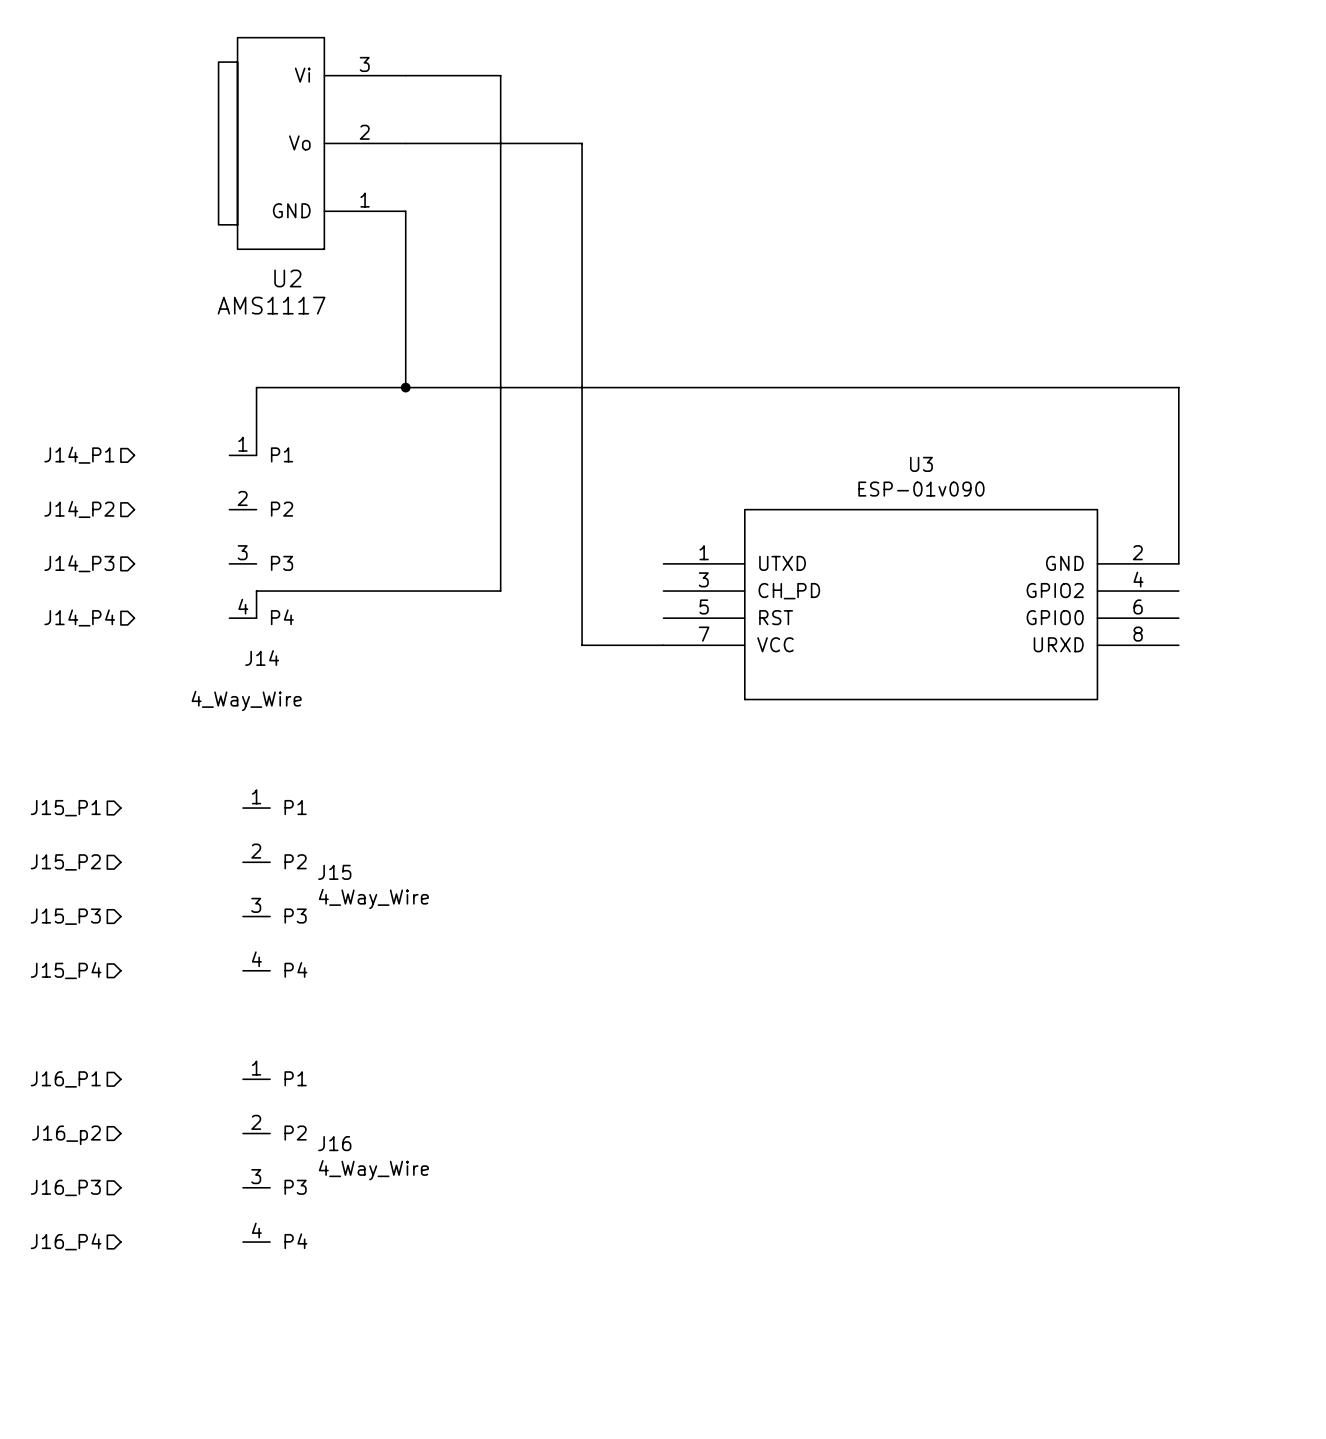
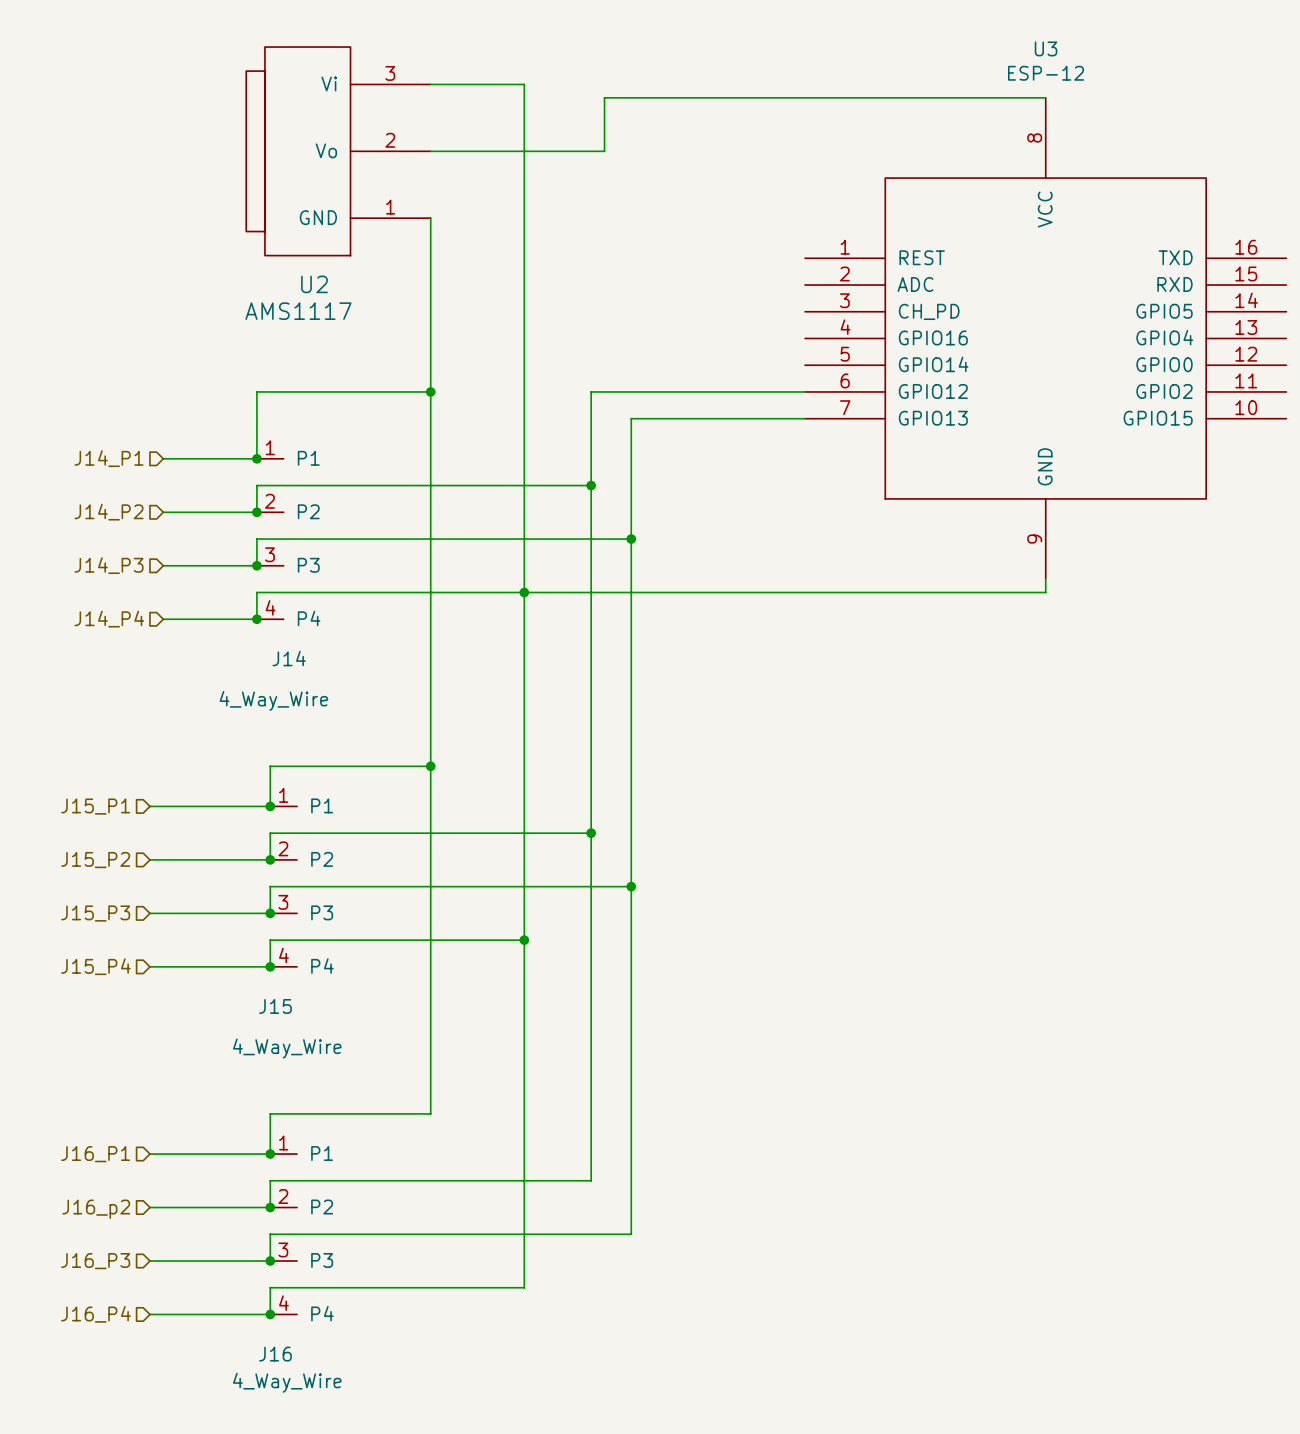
wire: (582, 143) (582, 645) (663, 645) -> (604, 151) (604, 97) (1045, 97)
wire: (256, 387) (256, 455) -> (283, 391) (256, 391) (256, 458) (163, 458)
wire: (405, 387) (568, 387) -> (149, 1207) (270, 1207) (270, 1180) (591, 1180) (591, 391)
wire: none -> (430, 391) (430, 1113) (270, 1113) (270, 1154) (149, 1154)
wire: (785, 387) (1178, 387) (1178, 563) -> none
wire: none -> (805, 418) (631, 418) (631, 1234) (270, 1234) (270, 1260) (149, 1260)
junction: none -> (256, 458)
U3 name position: U3 (921, 464) -> U3 (1046, 48)
wire: none -> (591, 485) (256, 485) (256, 512) (163, 512)
junction: none -> (591, 485)
U3 value: ESP-01v090 (921, 489) -> ESP-12 (1046, 73)
junction: none -> (256, 512)
U3 symbol: [663, 509, 1179, 700] -> [805, 97, 1287, 580]
wire: none -> (631, 539) (256, 539) (256, 565) (163, 565)
junction: none -> (631, 539)
junction: none -> (256, 565)
wire: none -> (1045, 579) (1045, 592) (524, 592) (524, 1287) (270, 1287) (270, 1314) (149, 1314)
wire: (256, 591) (256, 618) -> (283, 592) (256, 592) (256, 619) (163, 619)
junction: none -> (524, 592)
junction: none -> (256, 619)
wire: none -> (430, 766) (270, 766) (270, 806) (149, 806)
junction: none -> (430, 766)
junction: none -> (270, 806)
wire: none -> (591, 833) (270, 833) (270, 859) (149, 859)
junction: none -> (591, 833)
junction: none -> (270, 859)
J15 name position: J15 (334, 872) -> J15 (275, 1006)
wire: none -> (631, 886) (270, 886) (270, 913) (149, 913)
junction: none -> (631, 886)
J15 value position: 4_Way_Wire (373, 898) -> 4_Way_Wire (287, 1048)
junction: none -> (270, 913)
wire: none -> (524, 940) (270, 940) (270, 966) (149, 966)
junction: none -> (524, 940)
junction: none -> (270, 966)
hierarchical label position: J16_P1 (65, 1079) -> J16_P1 (95, 1154)
hierarchical label position: J16_p2 (66, 1135) -> J16_p2 (96, 1209)
J16 name position: J16 (334, 1143) -> J16 (275, 1354)
junction: none -> (270, 1154)
J16 position: (256, 1160) -> (283, 1234)
J16 value position: 4_Way_Wire (373, 1170) -> 4_Way_Wire (287, 1382)
hierarchical label position: J16_P3 (65, 1187) -> J16_P3 (95, 1261)
junction: none -> (270, 1207)
hierarchical label position: J16_P4 (66, 1241) -> J16_P4 (95, 1314)
junction: none -> (270, 1260)
junction: none -> (270, 1314)

